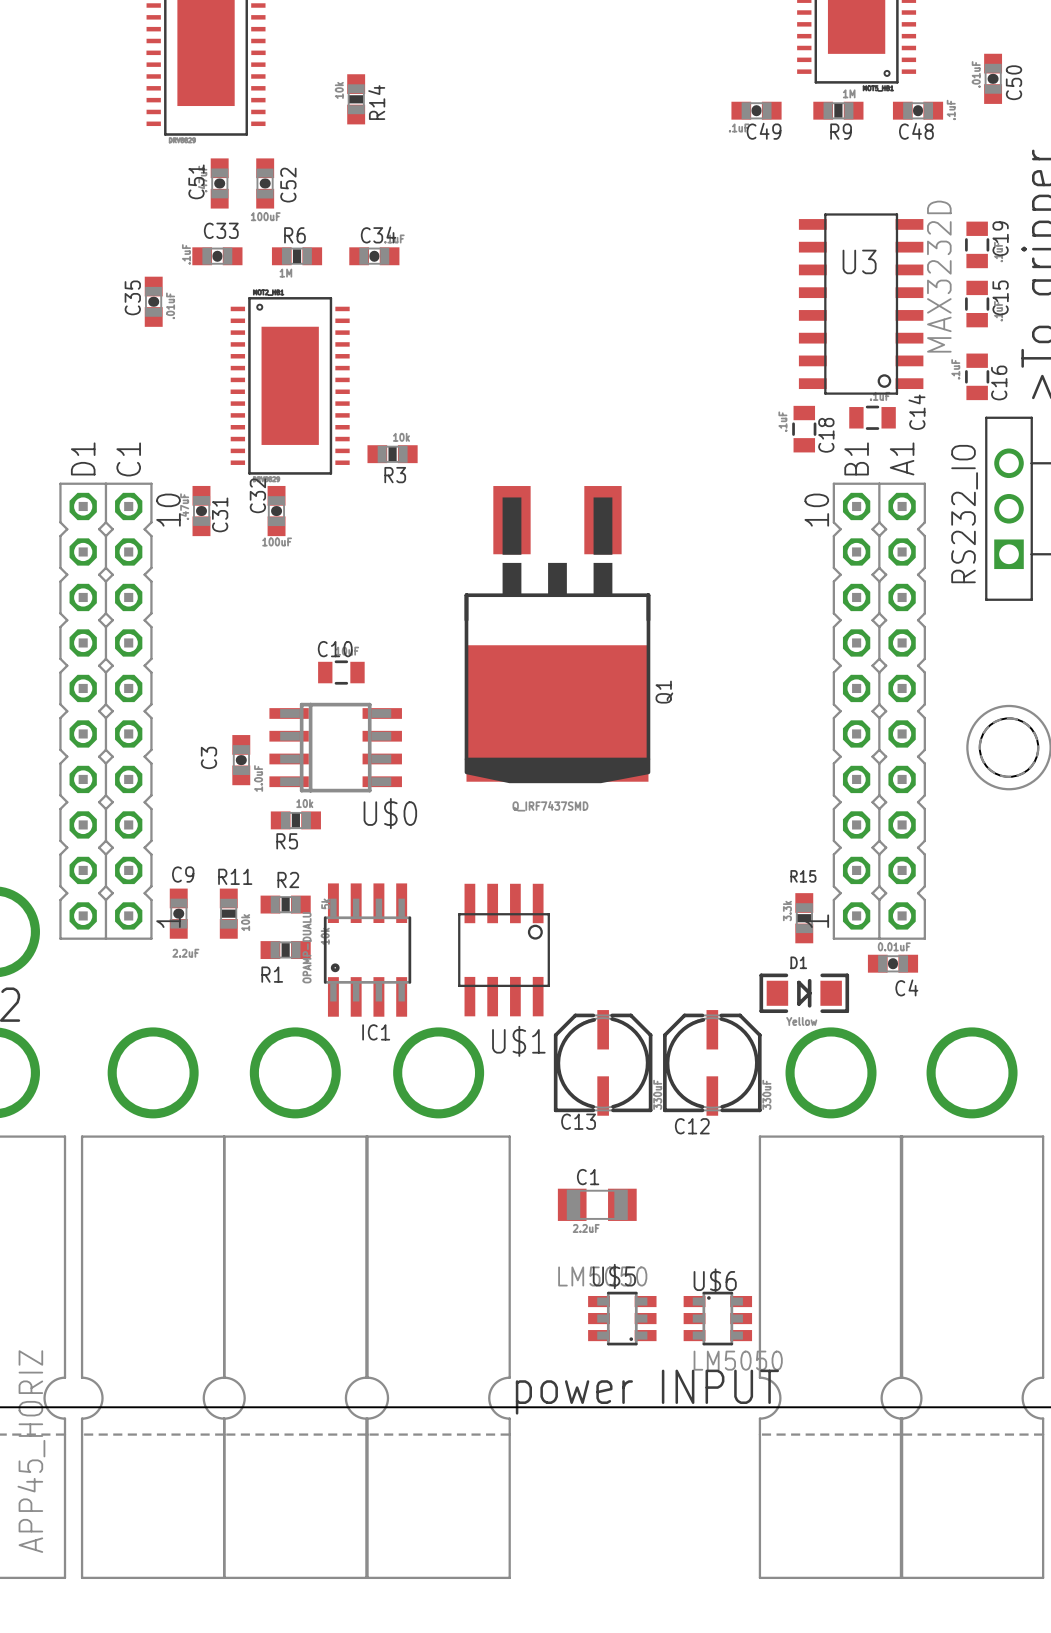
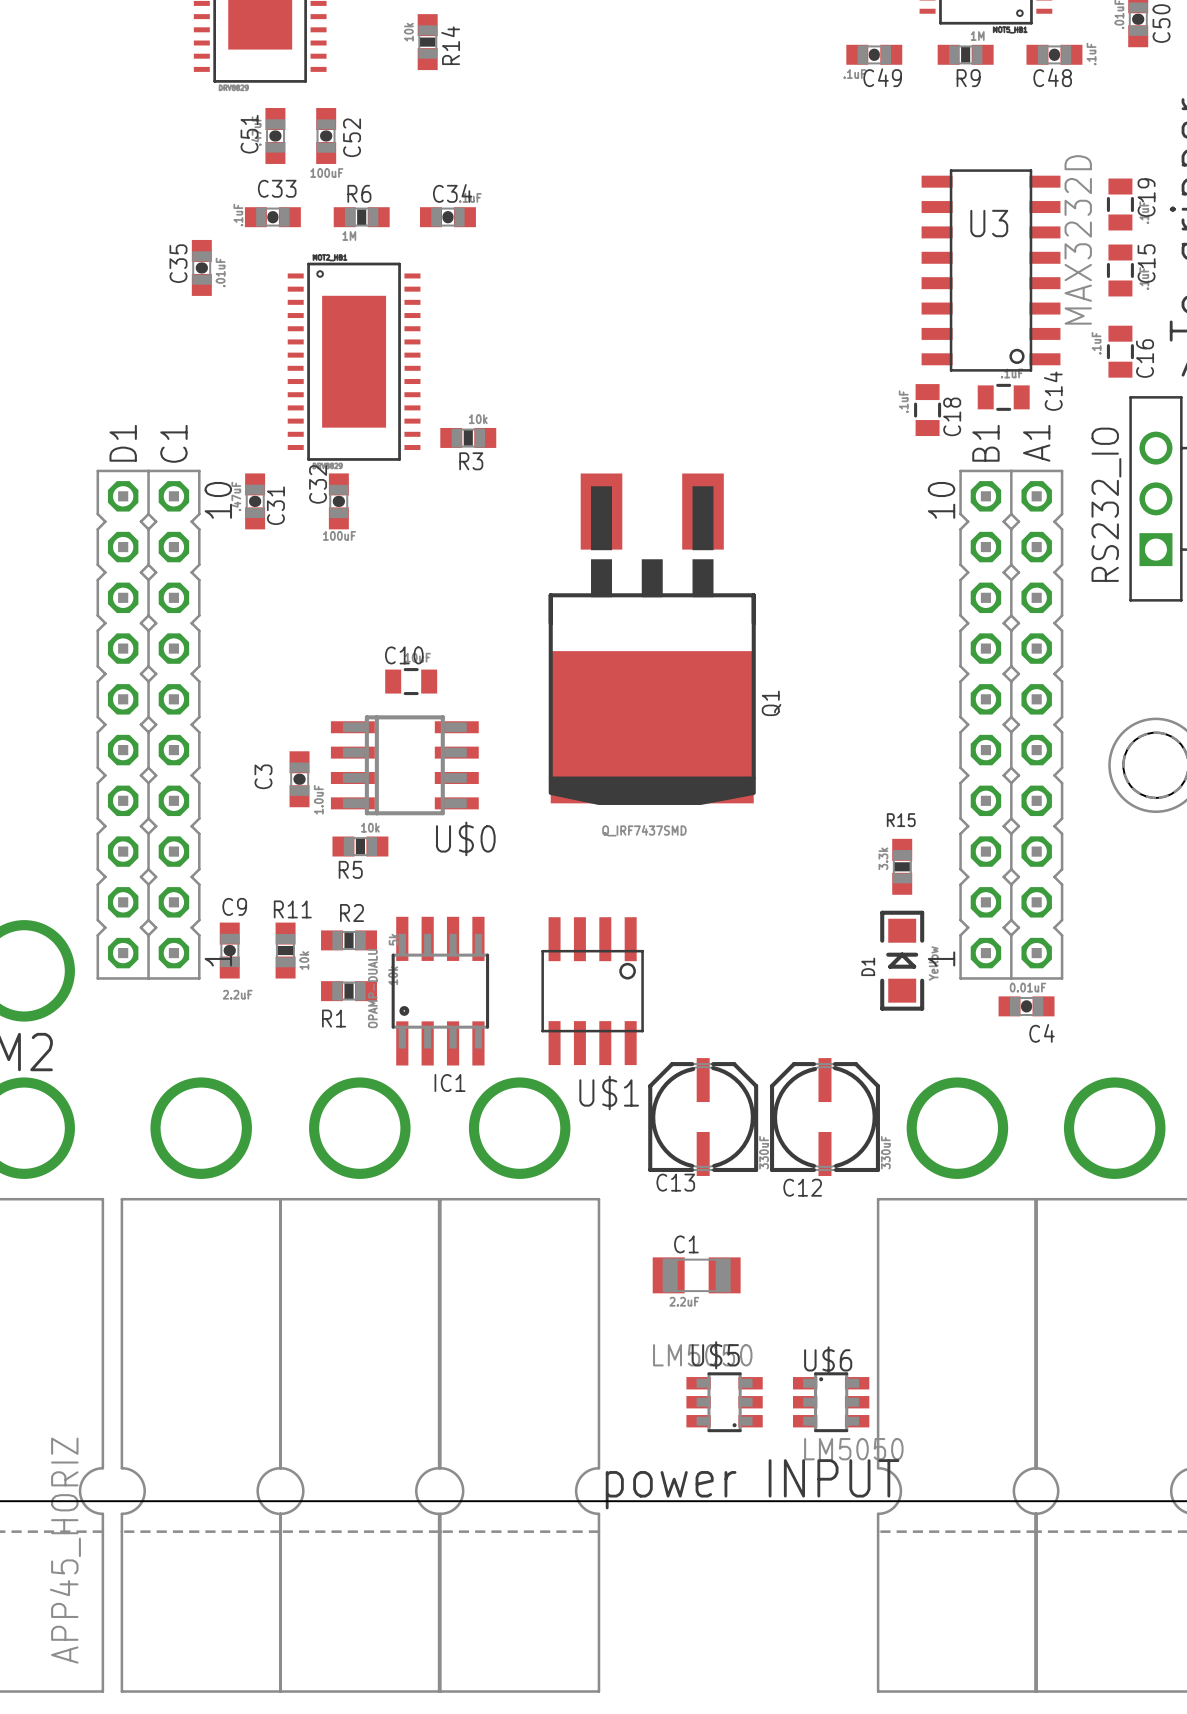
R15 position: (804, 918) -> (902, 866)
D1 rotation: 0° (804, 993) -> 90° counterclockwise (902, 960)
D1 position: (804, 993) -> (902, 960)

